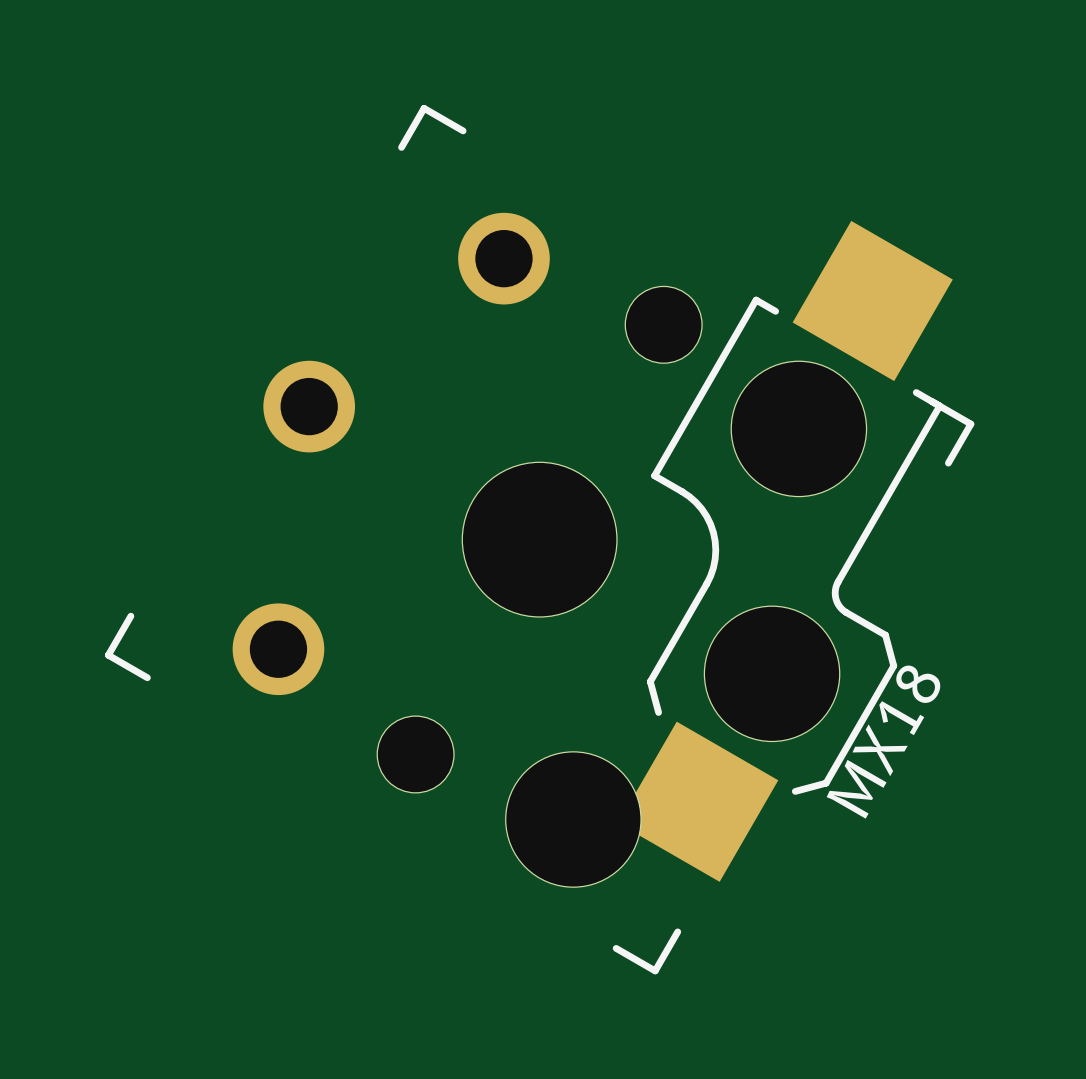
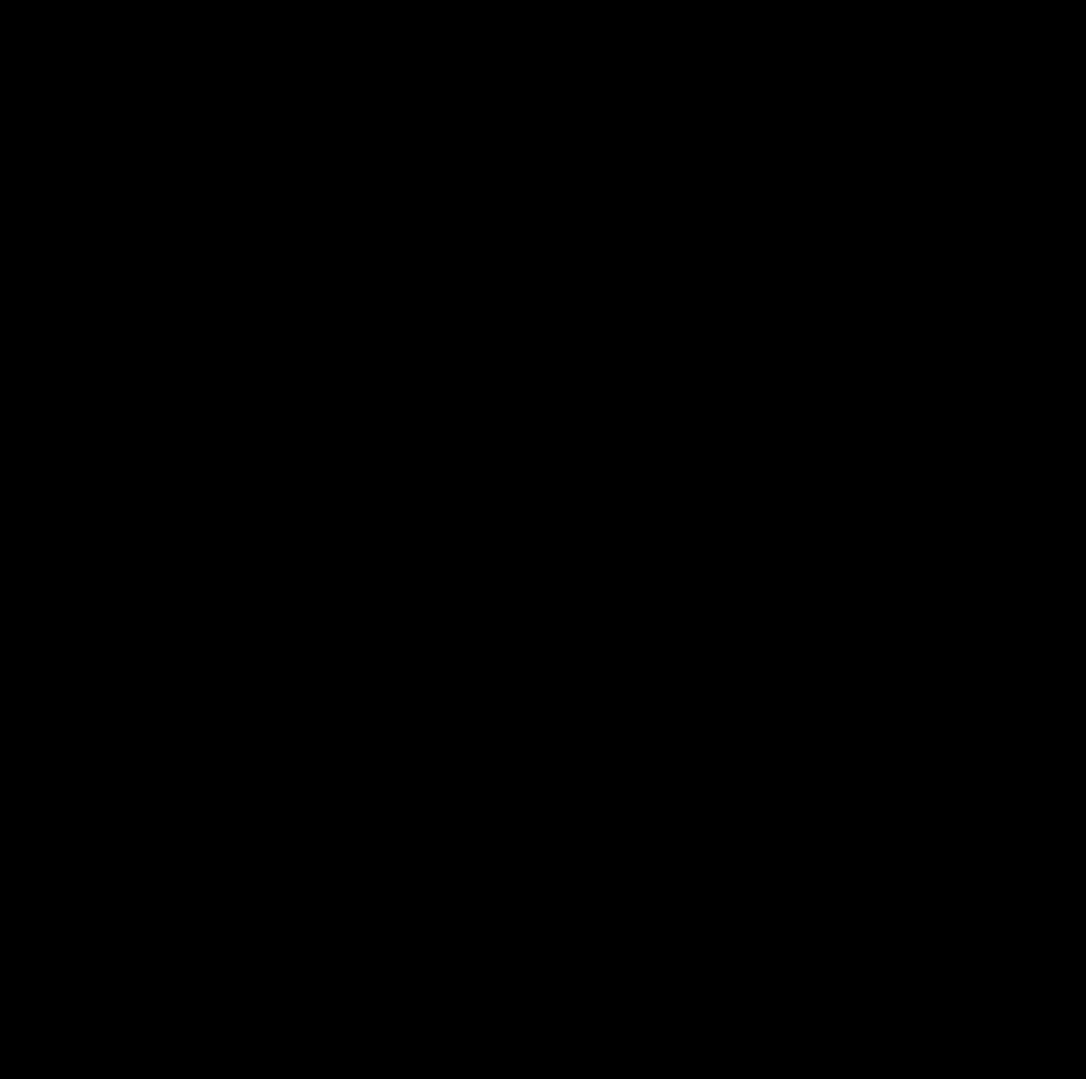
MX18: (539, 539) -> none

